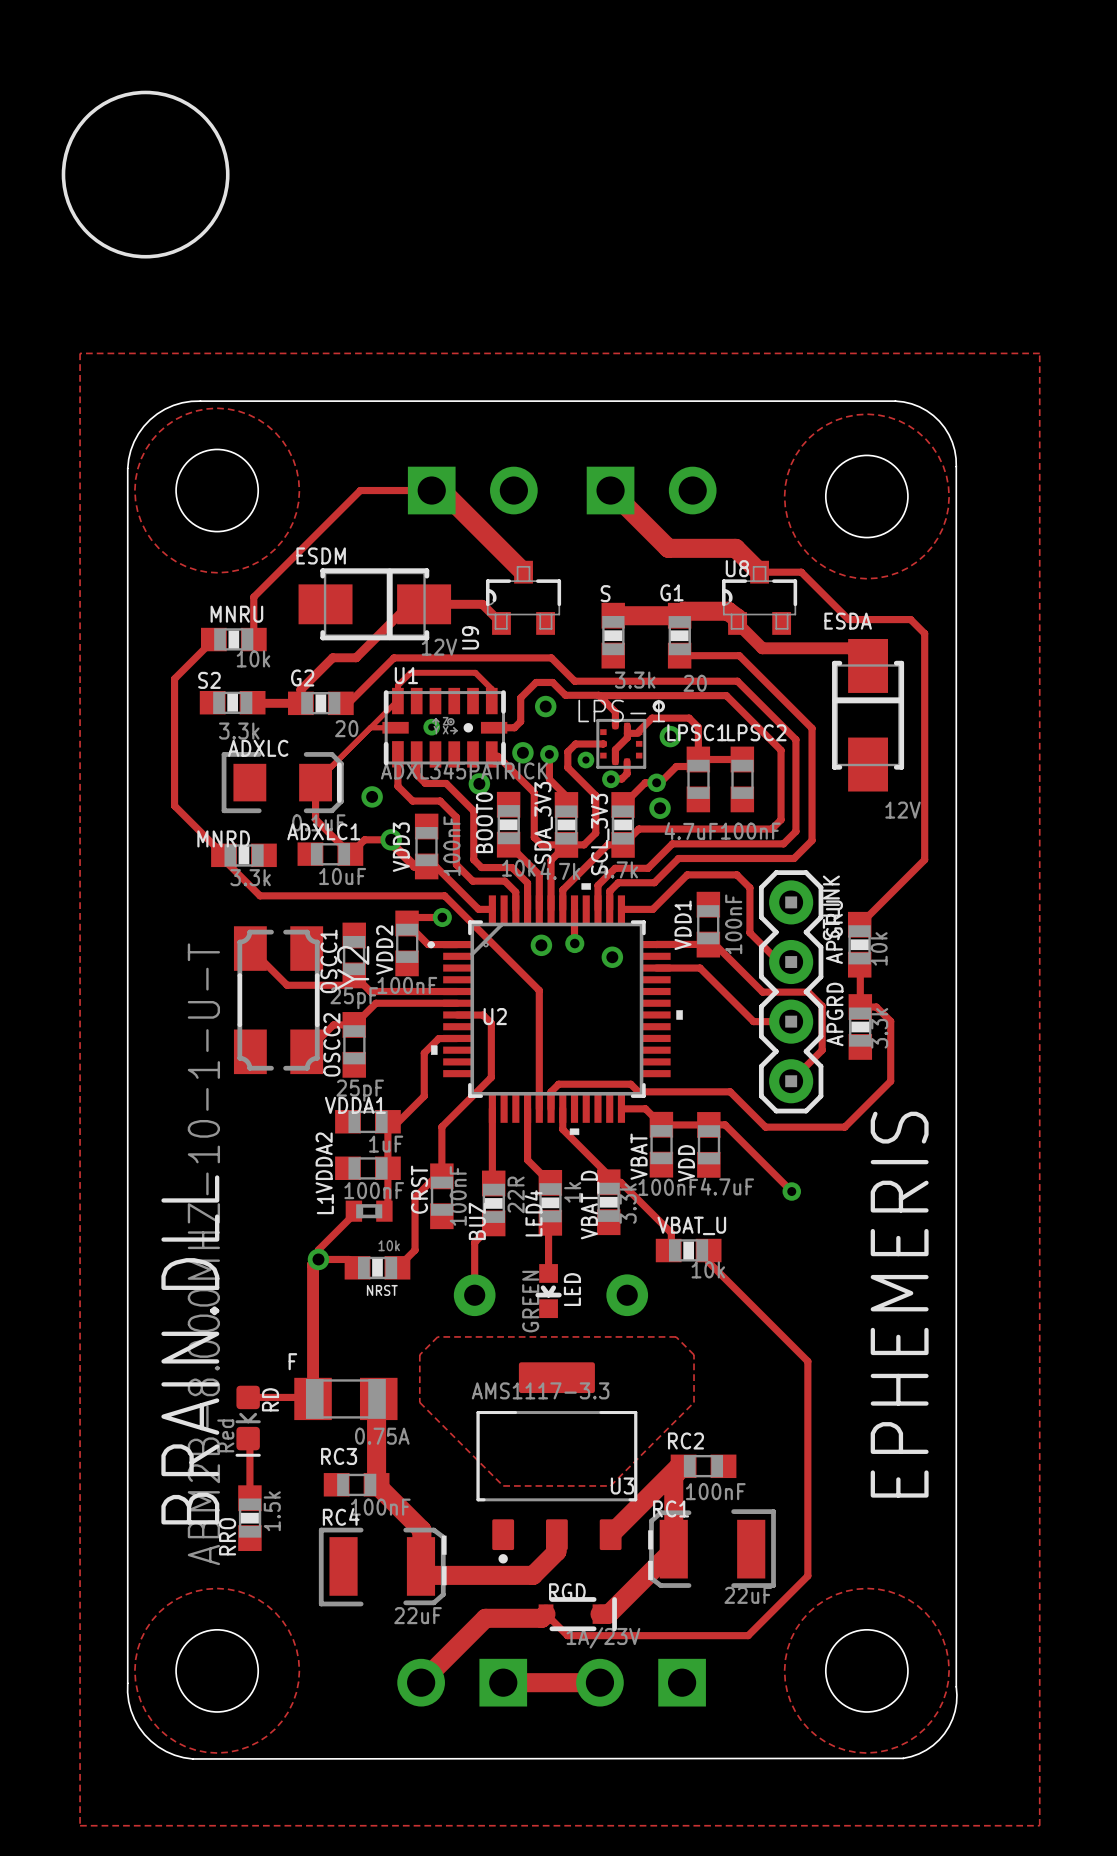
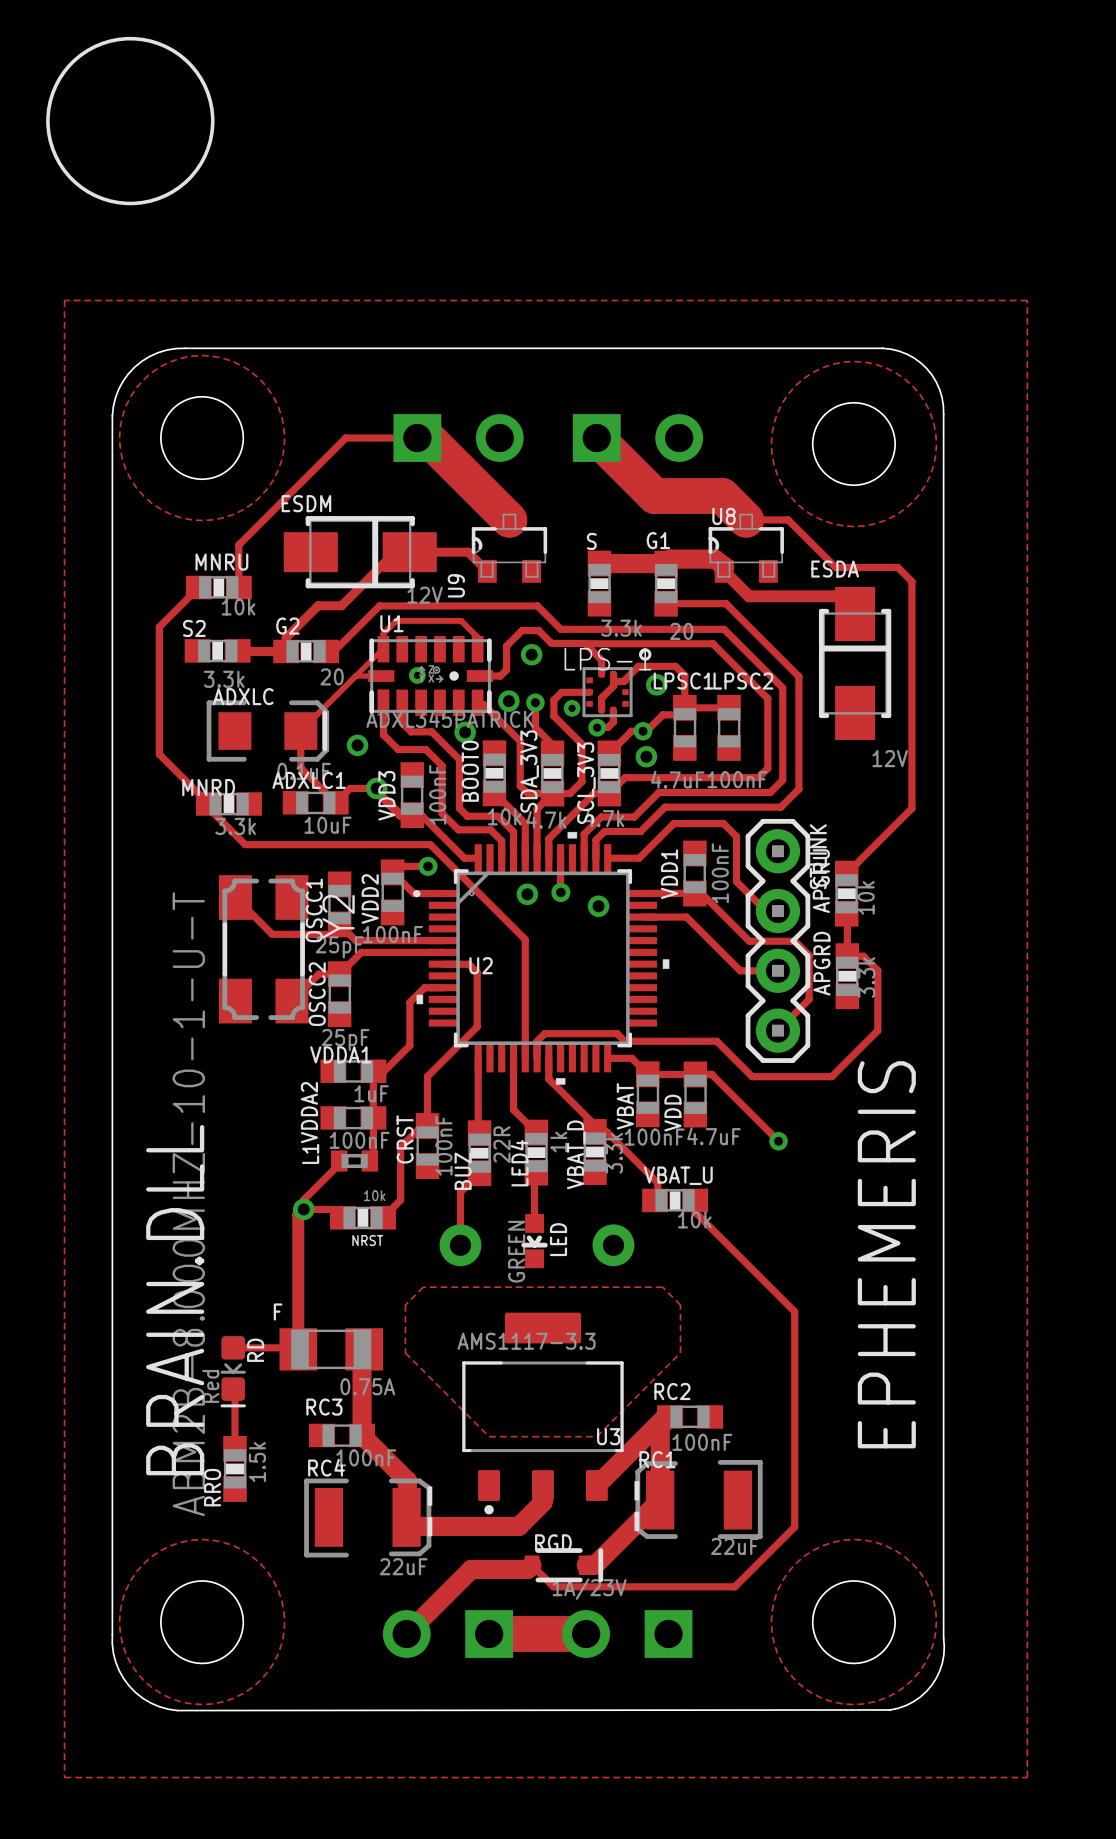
track width: thin (441, 490) (523, 572) -> thick (427, 438) (509, 519)
track width: thin (610, 490) (668, 548) (735, 548) (759, 572) -> thick (596, 438) (654, 496) (722, 496) (746, 519)
track width: thin (503, 1682) (599, 1682) -> thick (489, 1634) (586, 1634)

